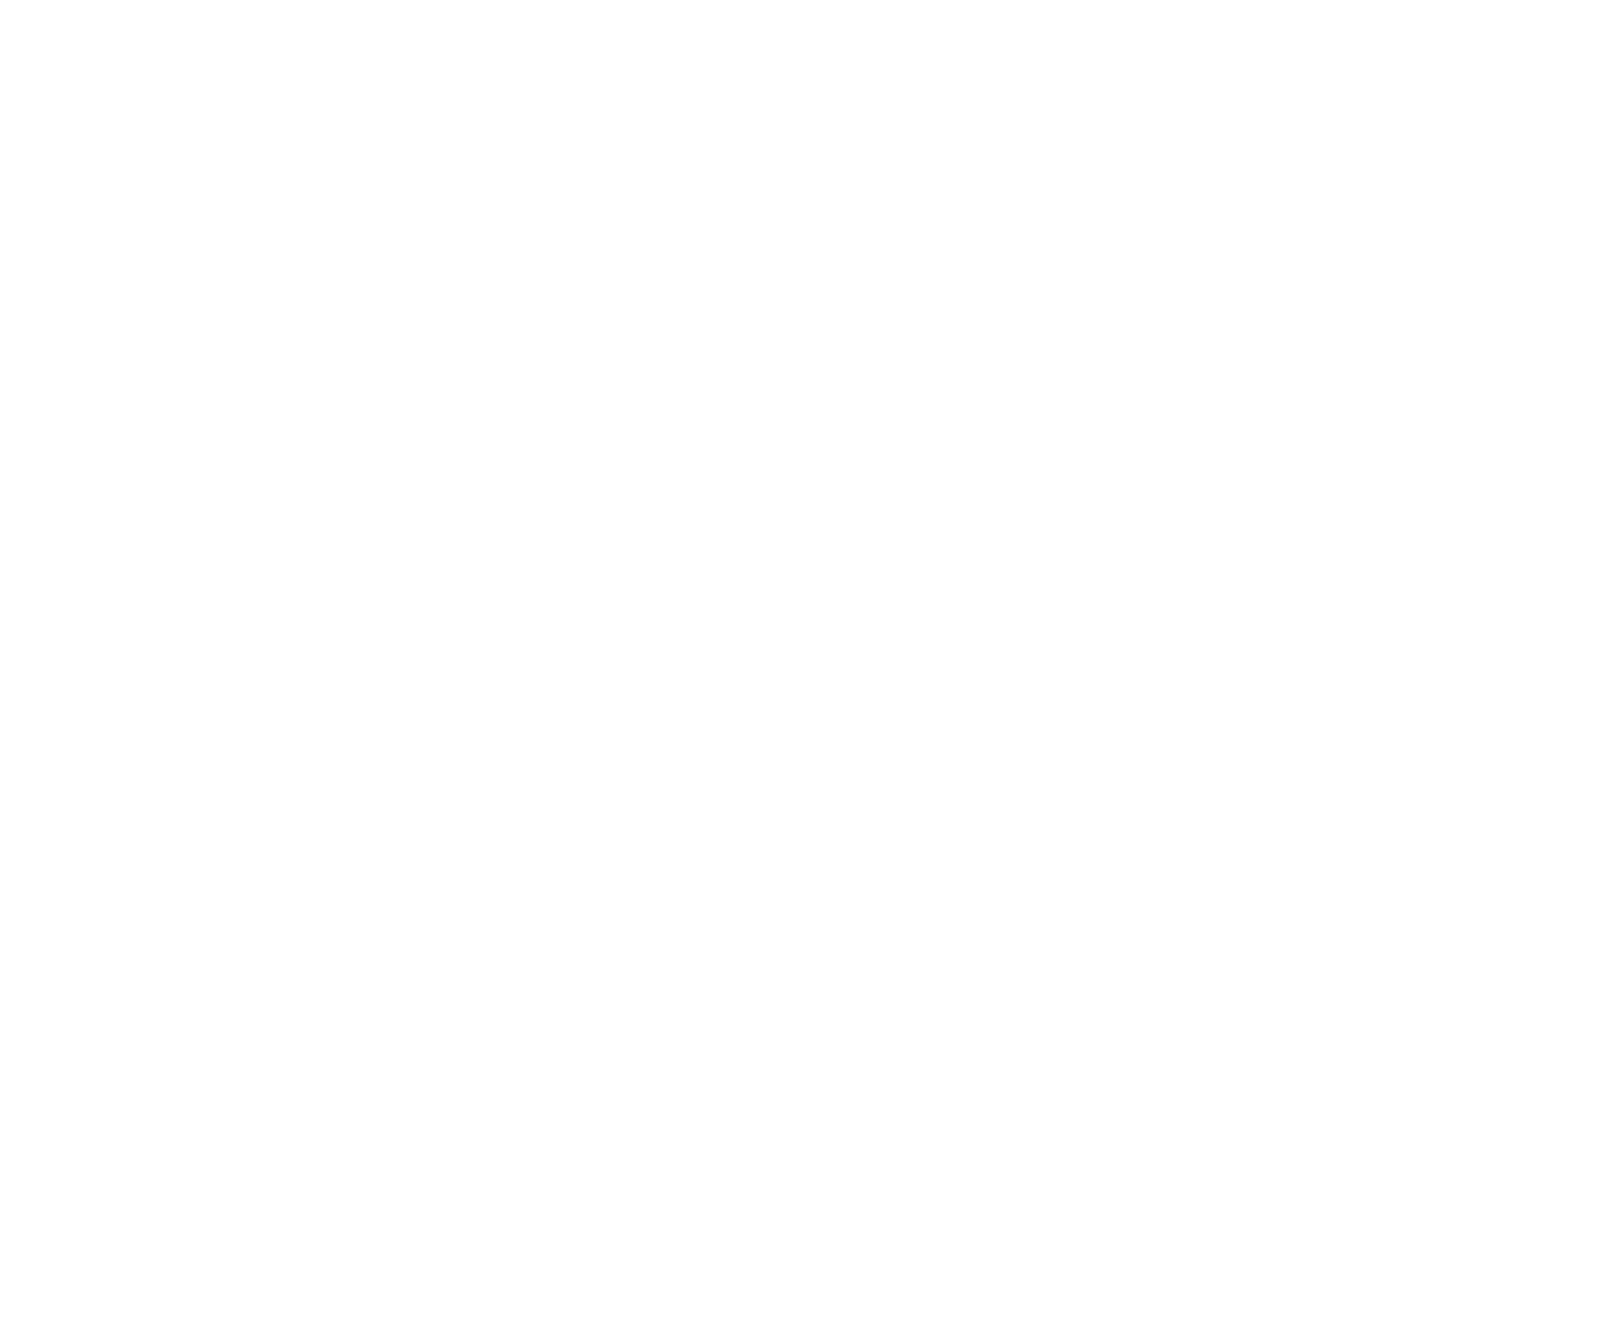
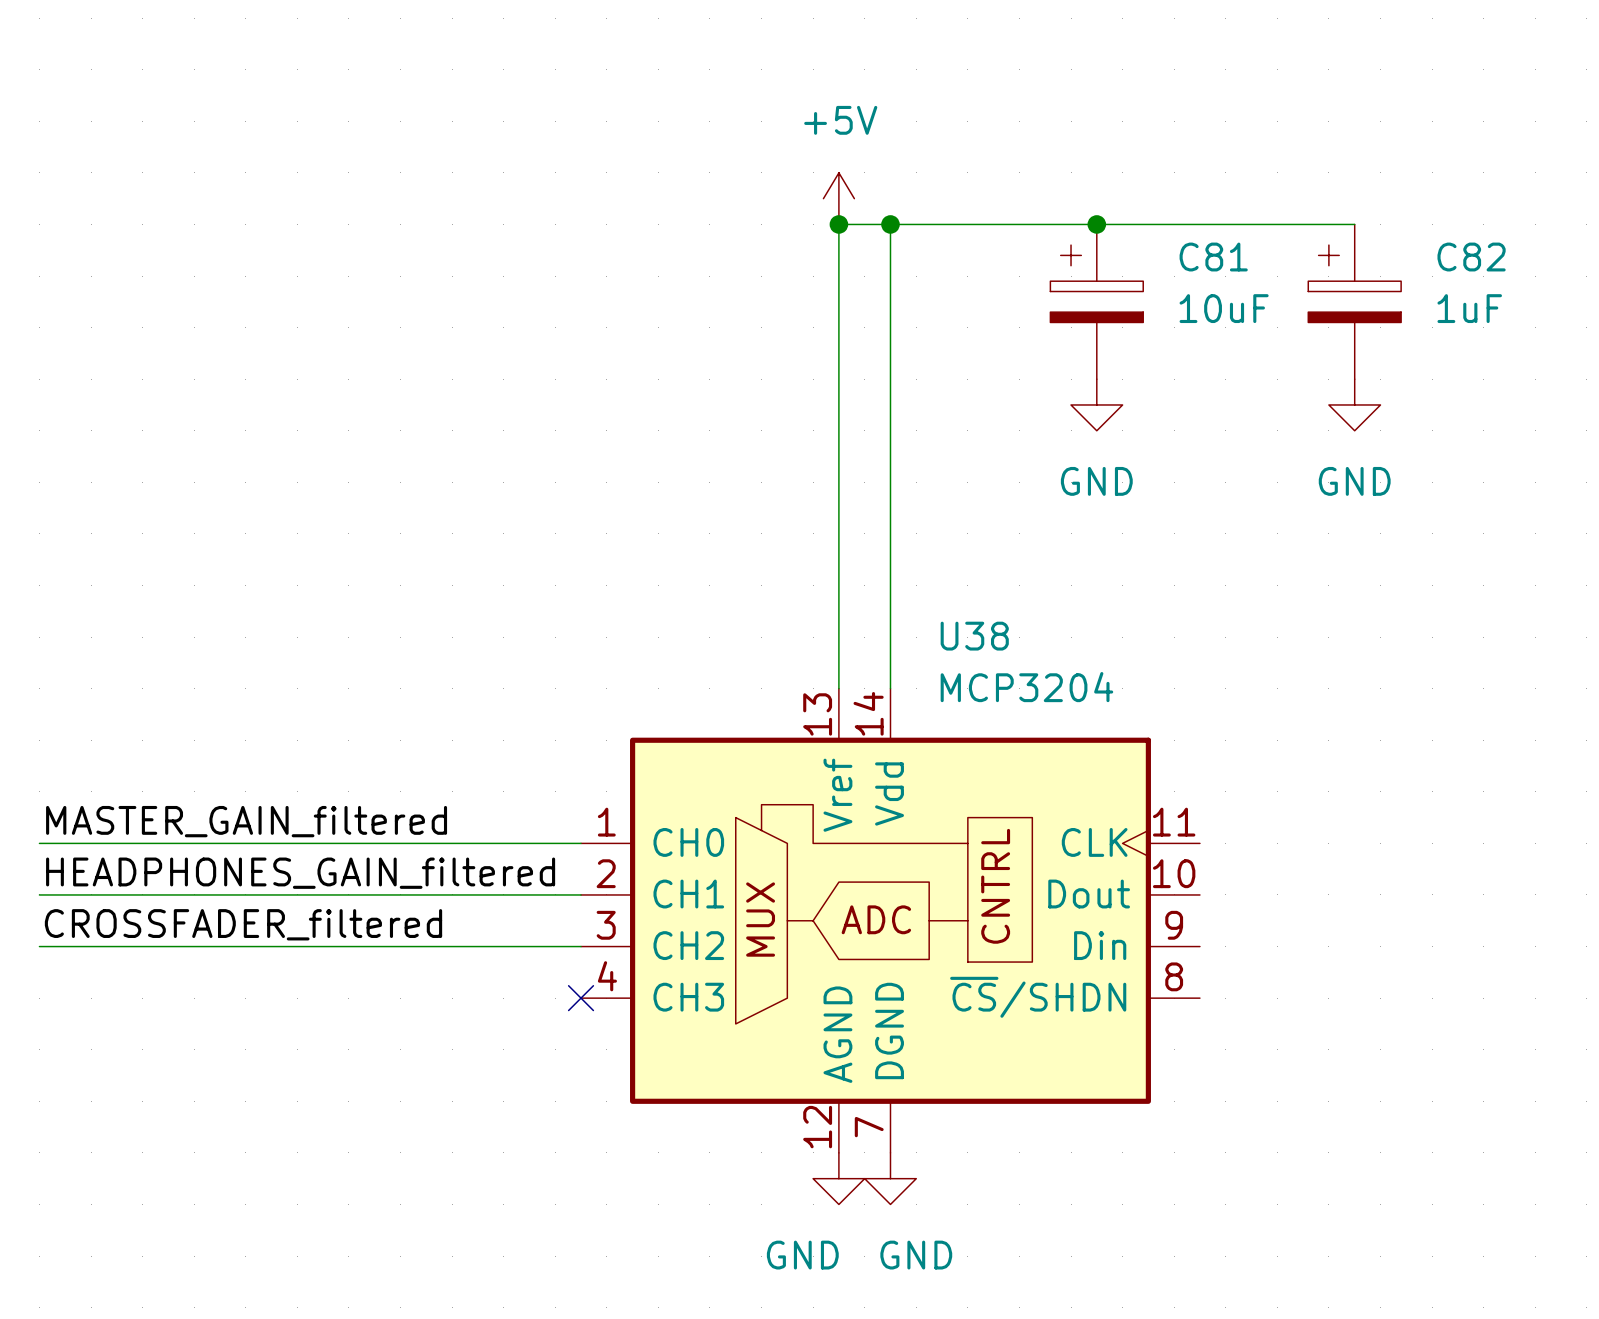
power symbol: none -> +5V (838, 198)
junction: none -> (838, 224)
wire: none -> (890, 224) (890, 688)
junction: none -> (890, 224)
junction: none -> (1096, 224)
wire: none -> (1354, 224) (838, 224) (838, 688)
C81: none -> 10uF (1096, 301)
C82: none -> 1uF (1354, 301)
power symbol: none -> GND (1096, 404)
power symbol: none -> GND (1354, 404)
label: none -> MASTER_GAIN_filtered (246, 821)
wire: none -> (39, 843) (581, 843)
label: none -> HEADPHONES_GAIN_filtered (300, 873)
wire: none -> (39, 894) (581, 894)
U38: none -> MCP3204 (890, 920)
label: none -> CROSSFADER_filtered (243, 924)
wire: none -> (39, 946) (581, 946)
no-connect mark: none -> (581, 998)
power symbol: none -> GND (838, 1178)
power symbol: none -> GND (890, 1178)

